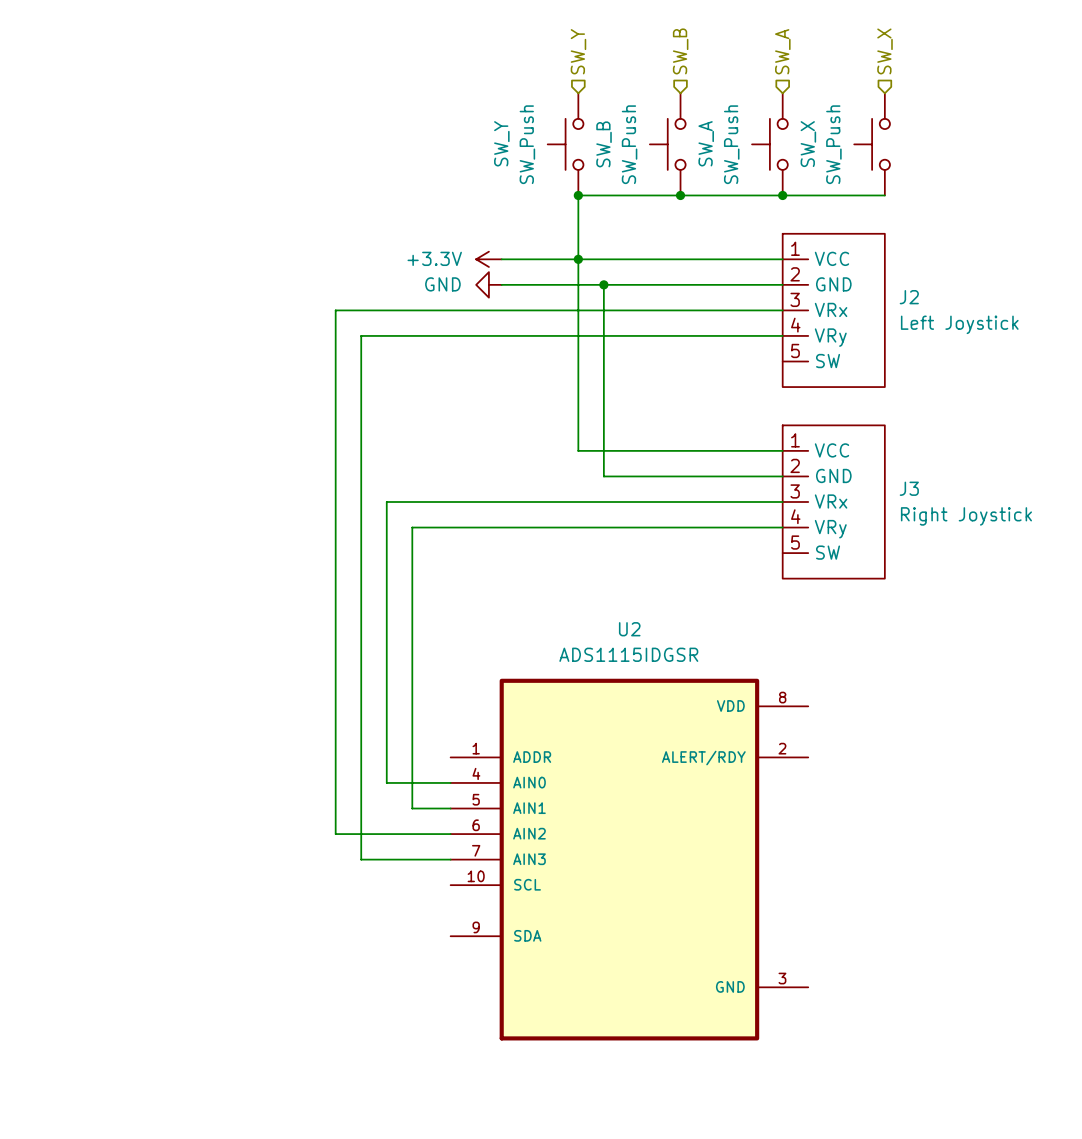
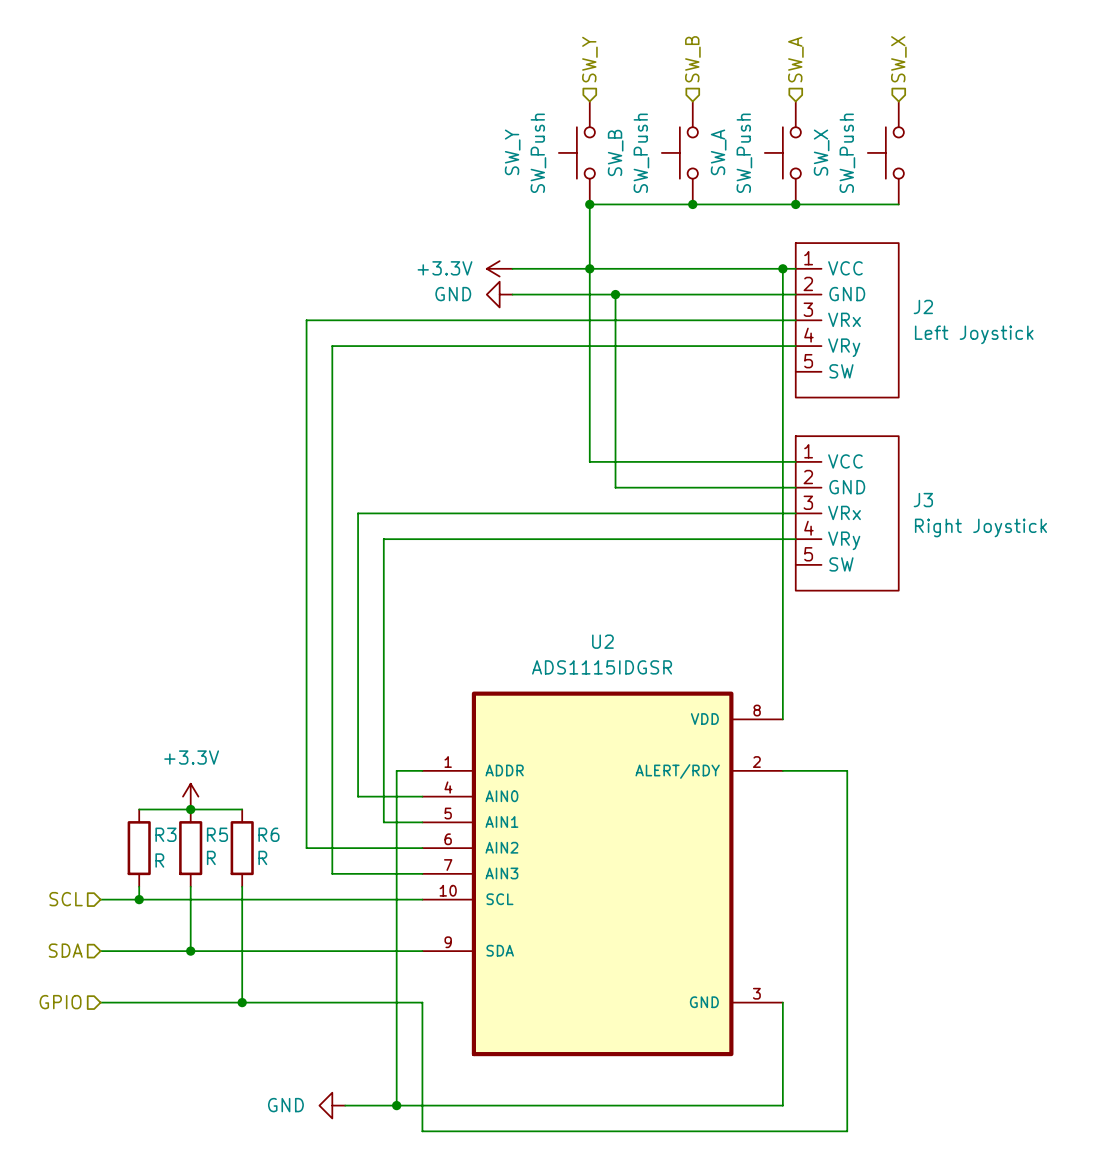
wire: none -> (782, 268) (782, 719)
junction: none -> (782, 268)
wire: (335, 310) (335, 834) -> (345, 320) (306, 320) (306, 848) (345, 848)
wire: (361, 335) (361, 859) -> (370, 346) (332, 346) (332, 873) (370, 873)
wire: (386, 501) (386, 757) -> (422, 770) (396, 770)
wire: none -> (396, 513) (358, 513) (358, 796) (396, 796) (396, 1105)
wire: (412, 527) (412, 808) (450, 808) -> (422, 539) (383, 539) (383, 822) (422, 822)
wire: none -> (782, 770) (847, 770) (847, 1131) (422, 1131) (422, 1002) (100, 1002)
power symbol: none -> +3.3V (190, 796)
wire: none -> (139, 809) (242, 809)
junction: none -> (190, 809)
R3: none -> R (139, 848)
R5: none -> R (190, 848)
R6: none -> R (242, 848)
U2 position: (629, 859) -> (602, 873)
wire: none -> (139, 886) (139, 899)
wire: none -> (190, 886) (190, 951)
wire: none -> (242, 886) (242, 1002)
hierarchical label: none -> SCL (66, 899)
wire: none -> (100, 899) (422, 899)
junction: none -> (139, 899)
hierarchical label: none -> SDA (65, 950)
wire: none -> (100, 951) (422, 951)
junction: none -> (190, 951)
hierarchical label: none -> GPIO (60, 1002)
junction: none -> (242, 1002)
wire: none -> (782, 1002) (782, 1105) (345, 1105)
power symbol: none -> GND (332, 1105)
junction: none -> (396, 1105)

